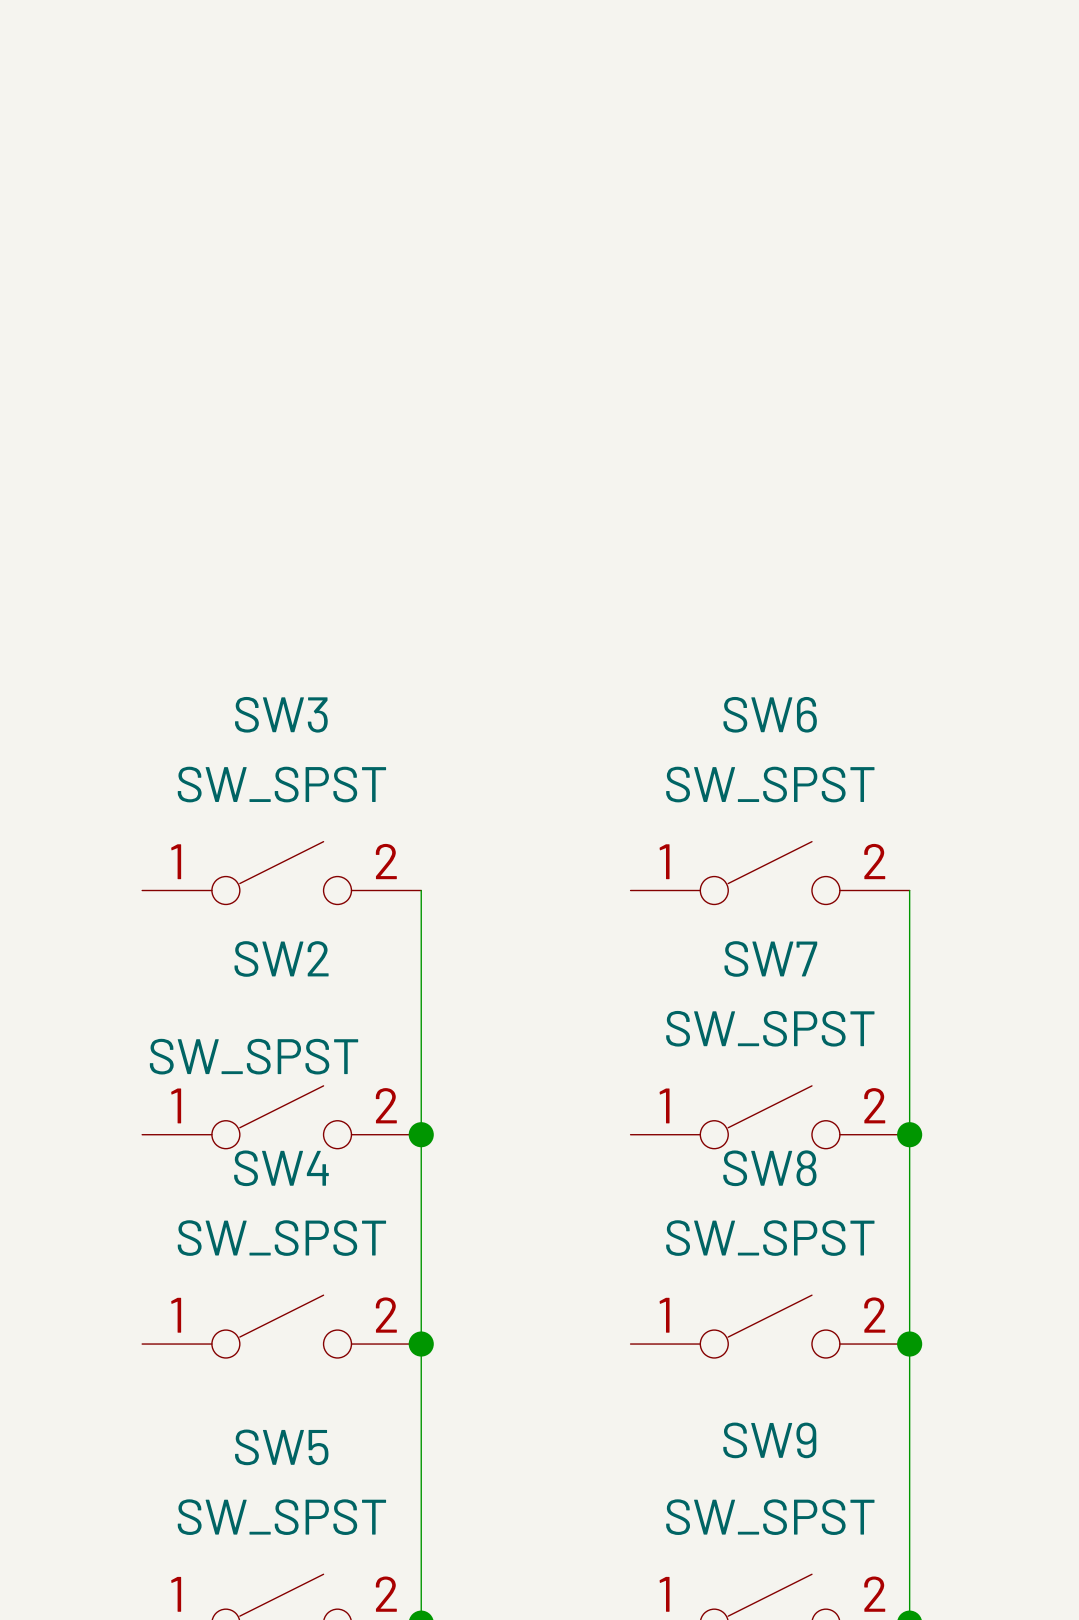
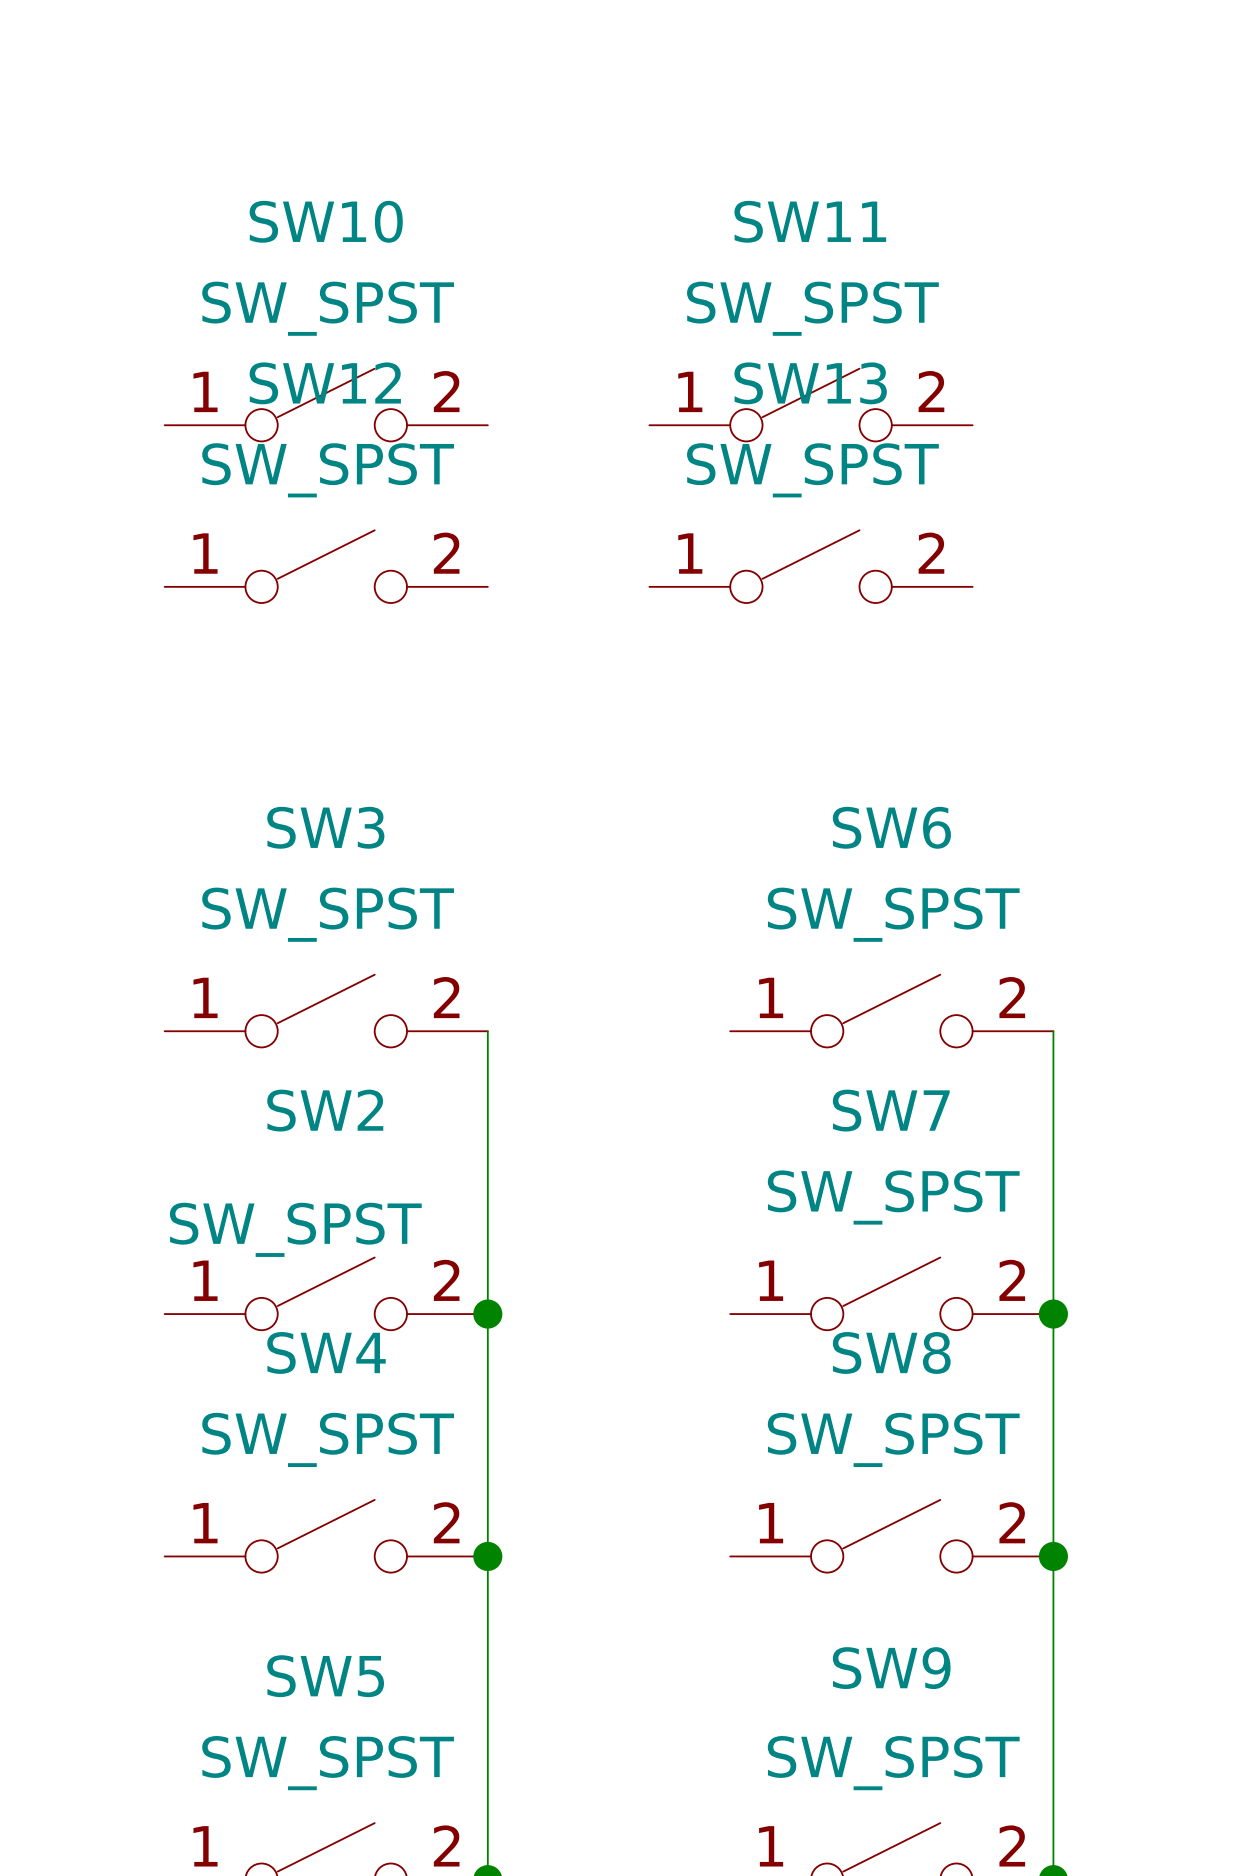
SW10: none -> SW_SPST (326, 405)
SW11: none -> SW_SPST (811, 405)
SW12: none -> SW_SPST (326, 566)
SW13: none -> SW_SPST (811, 566)

